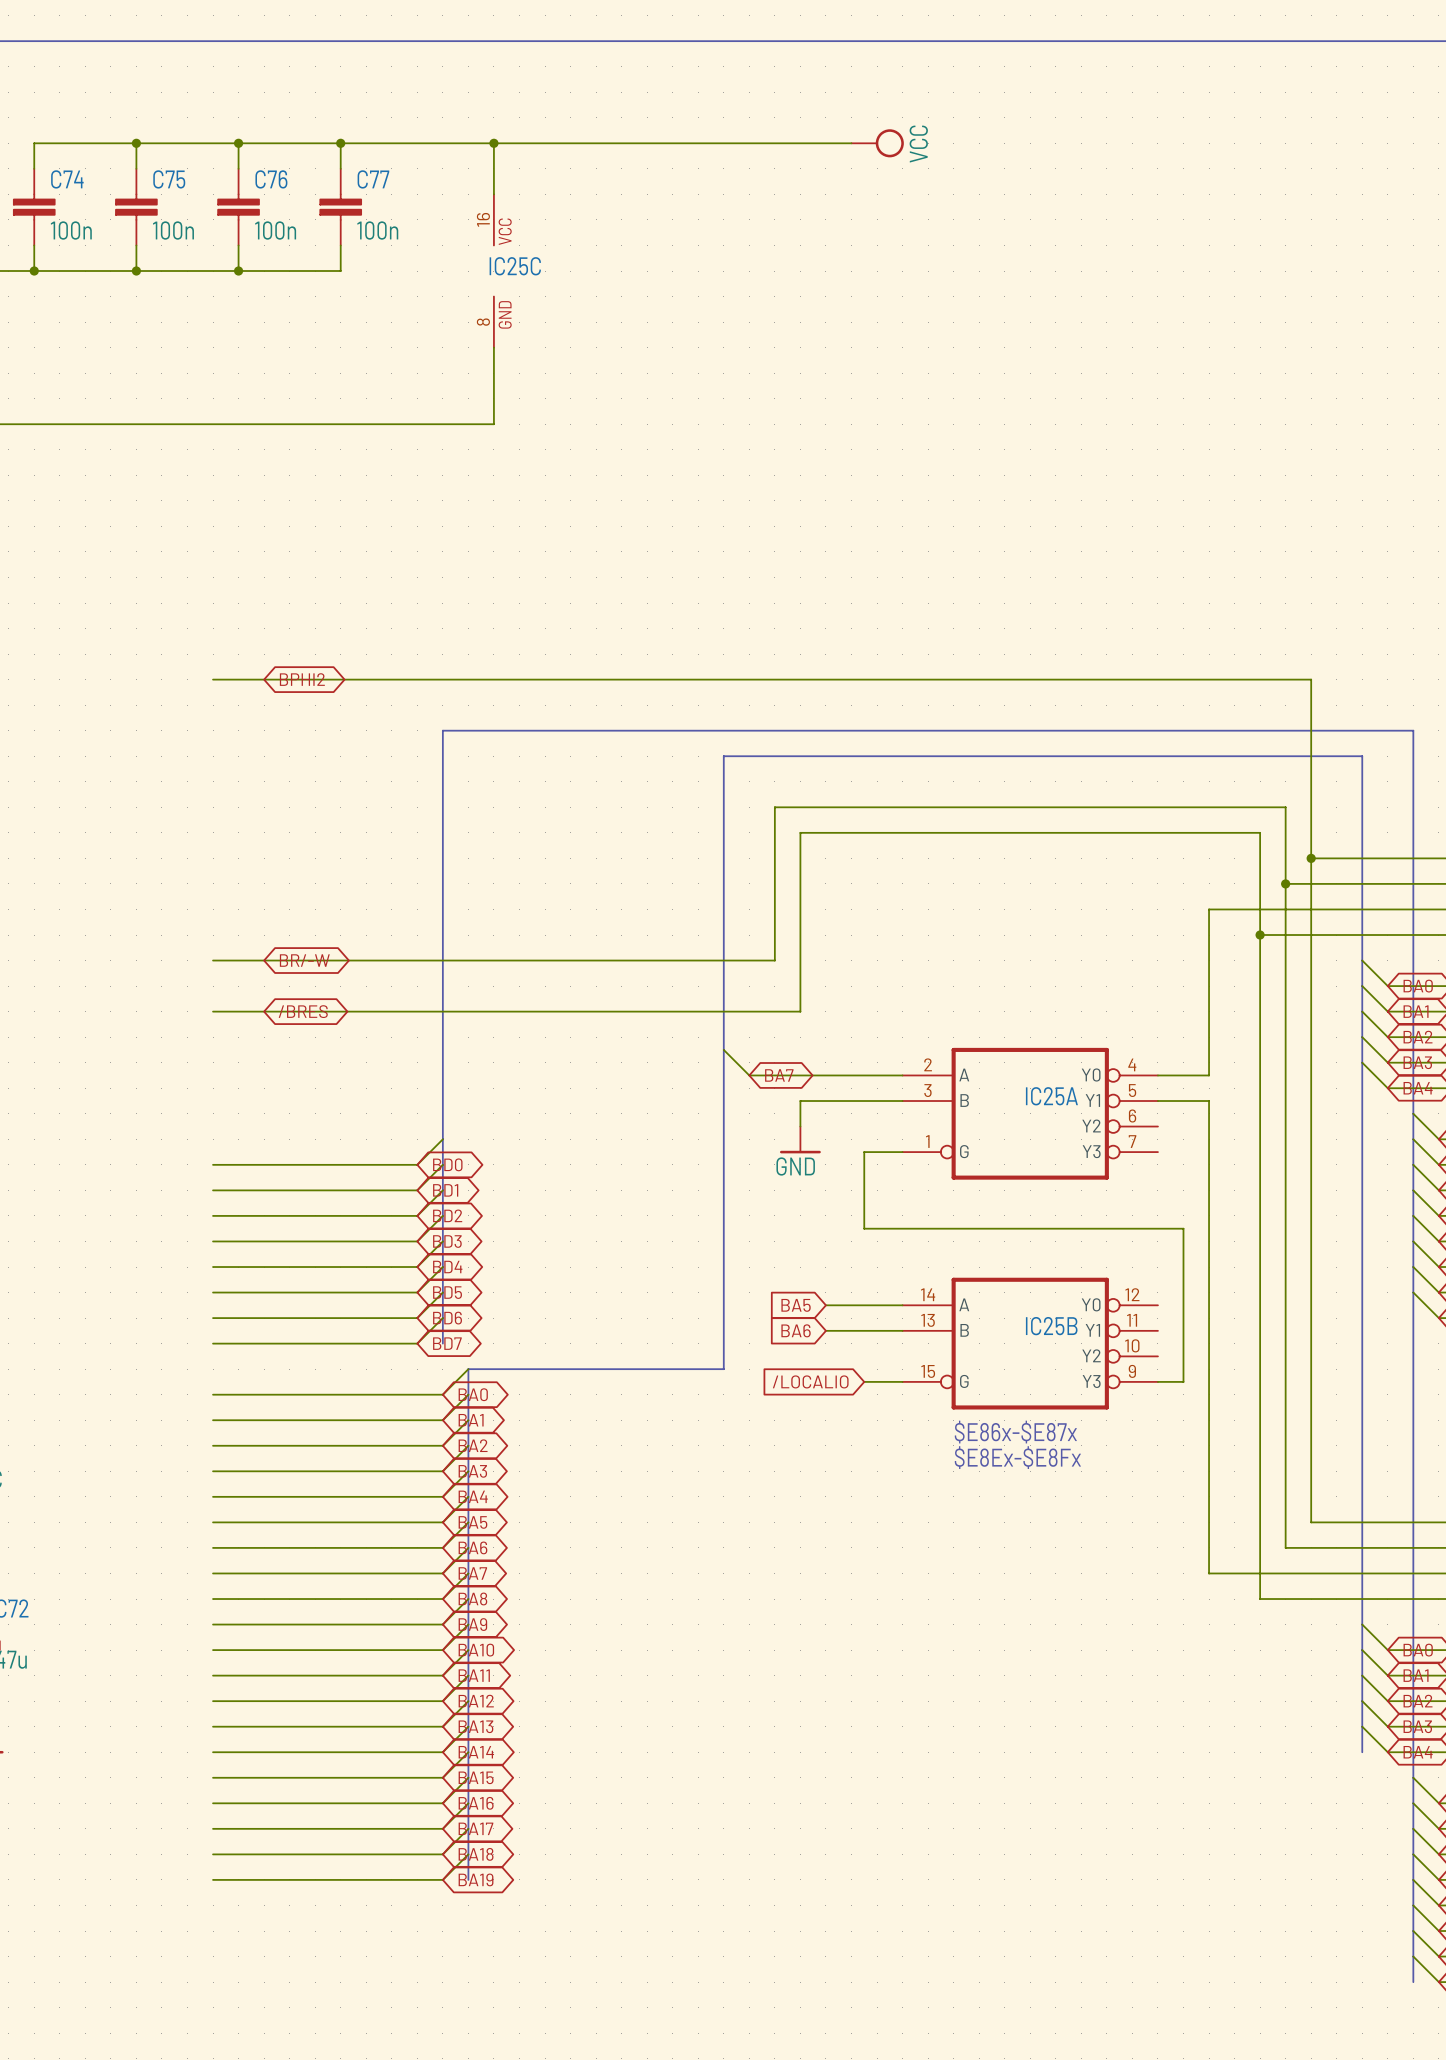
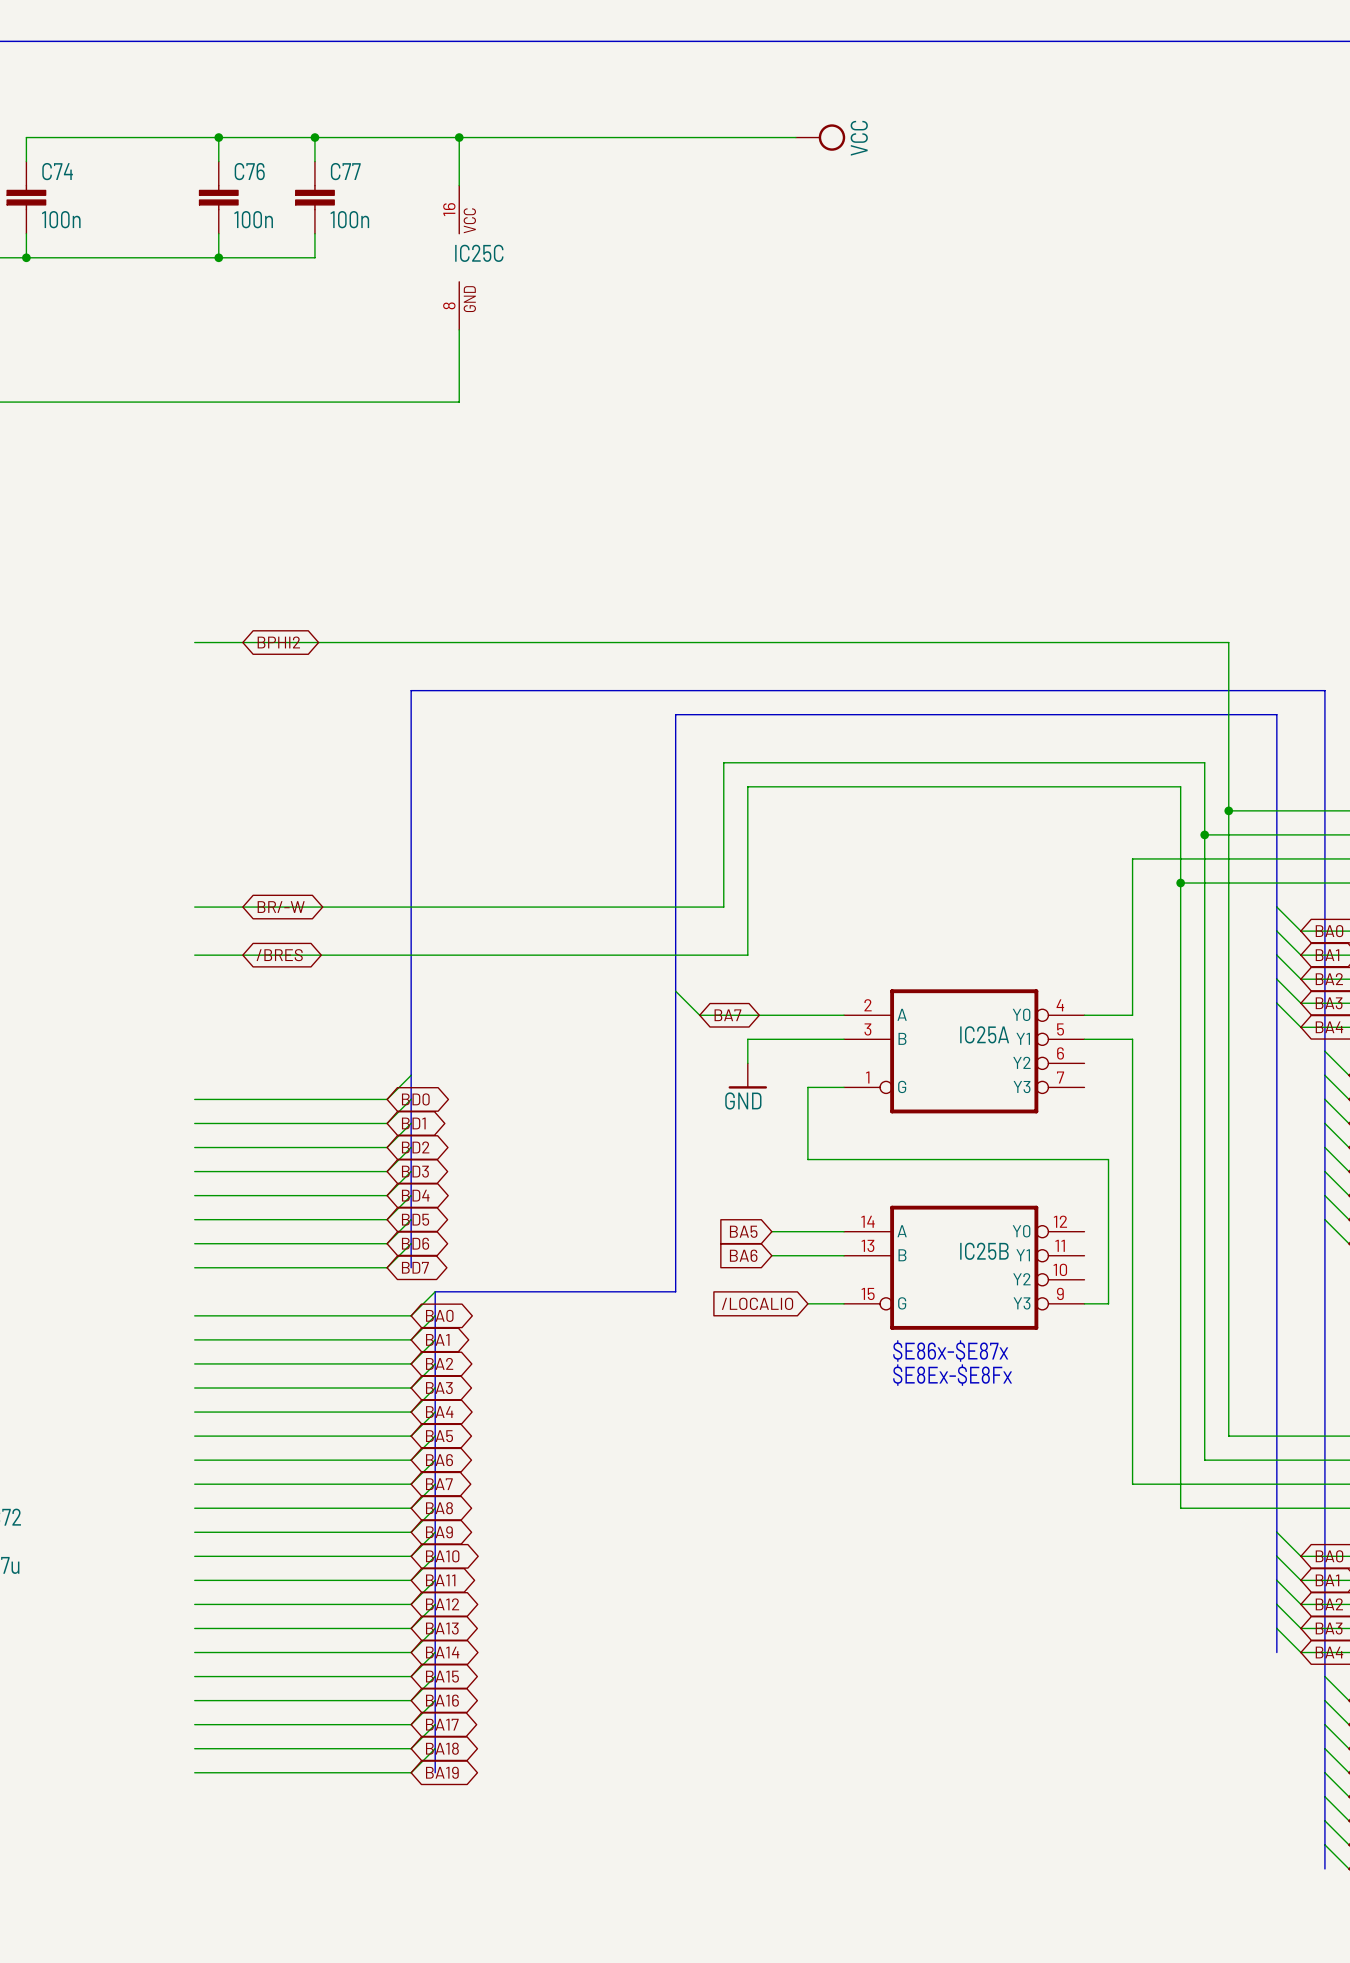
wire: (136, 143) (136, 168) -> none
junction: (136, 143) -> none
C75: 100n (136, 207) -> none
wire: (136, 245) (136, 271) -> none
junction: (136, 271) -> none

